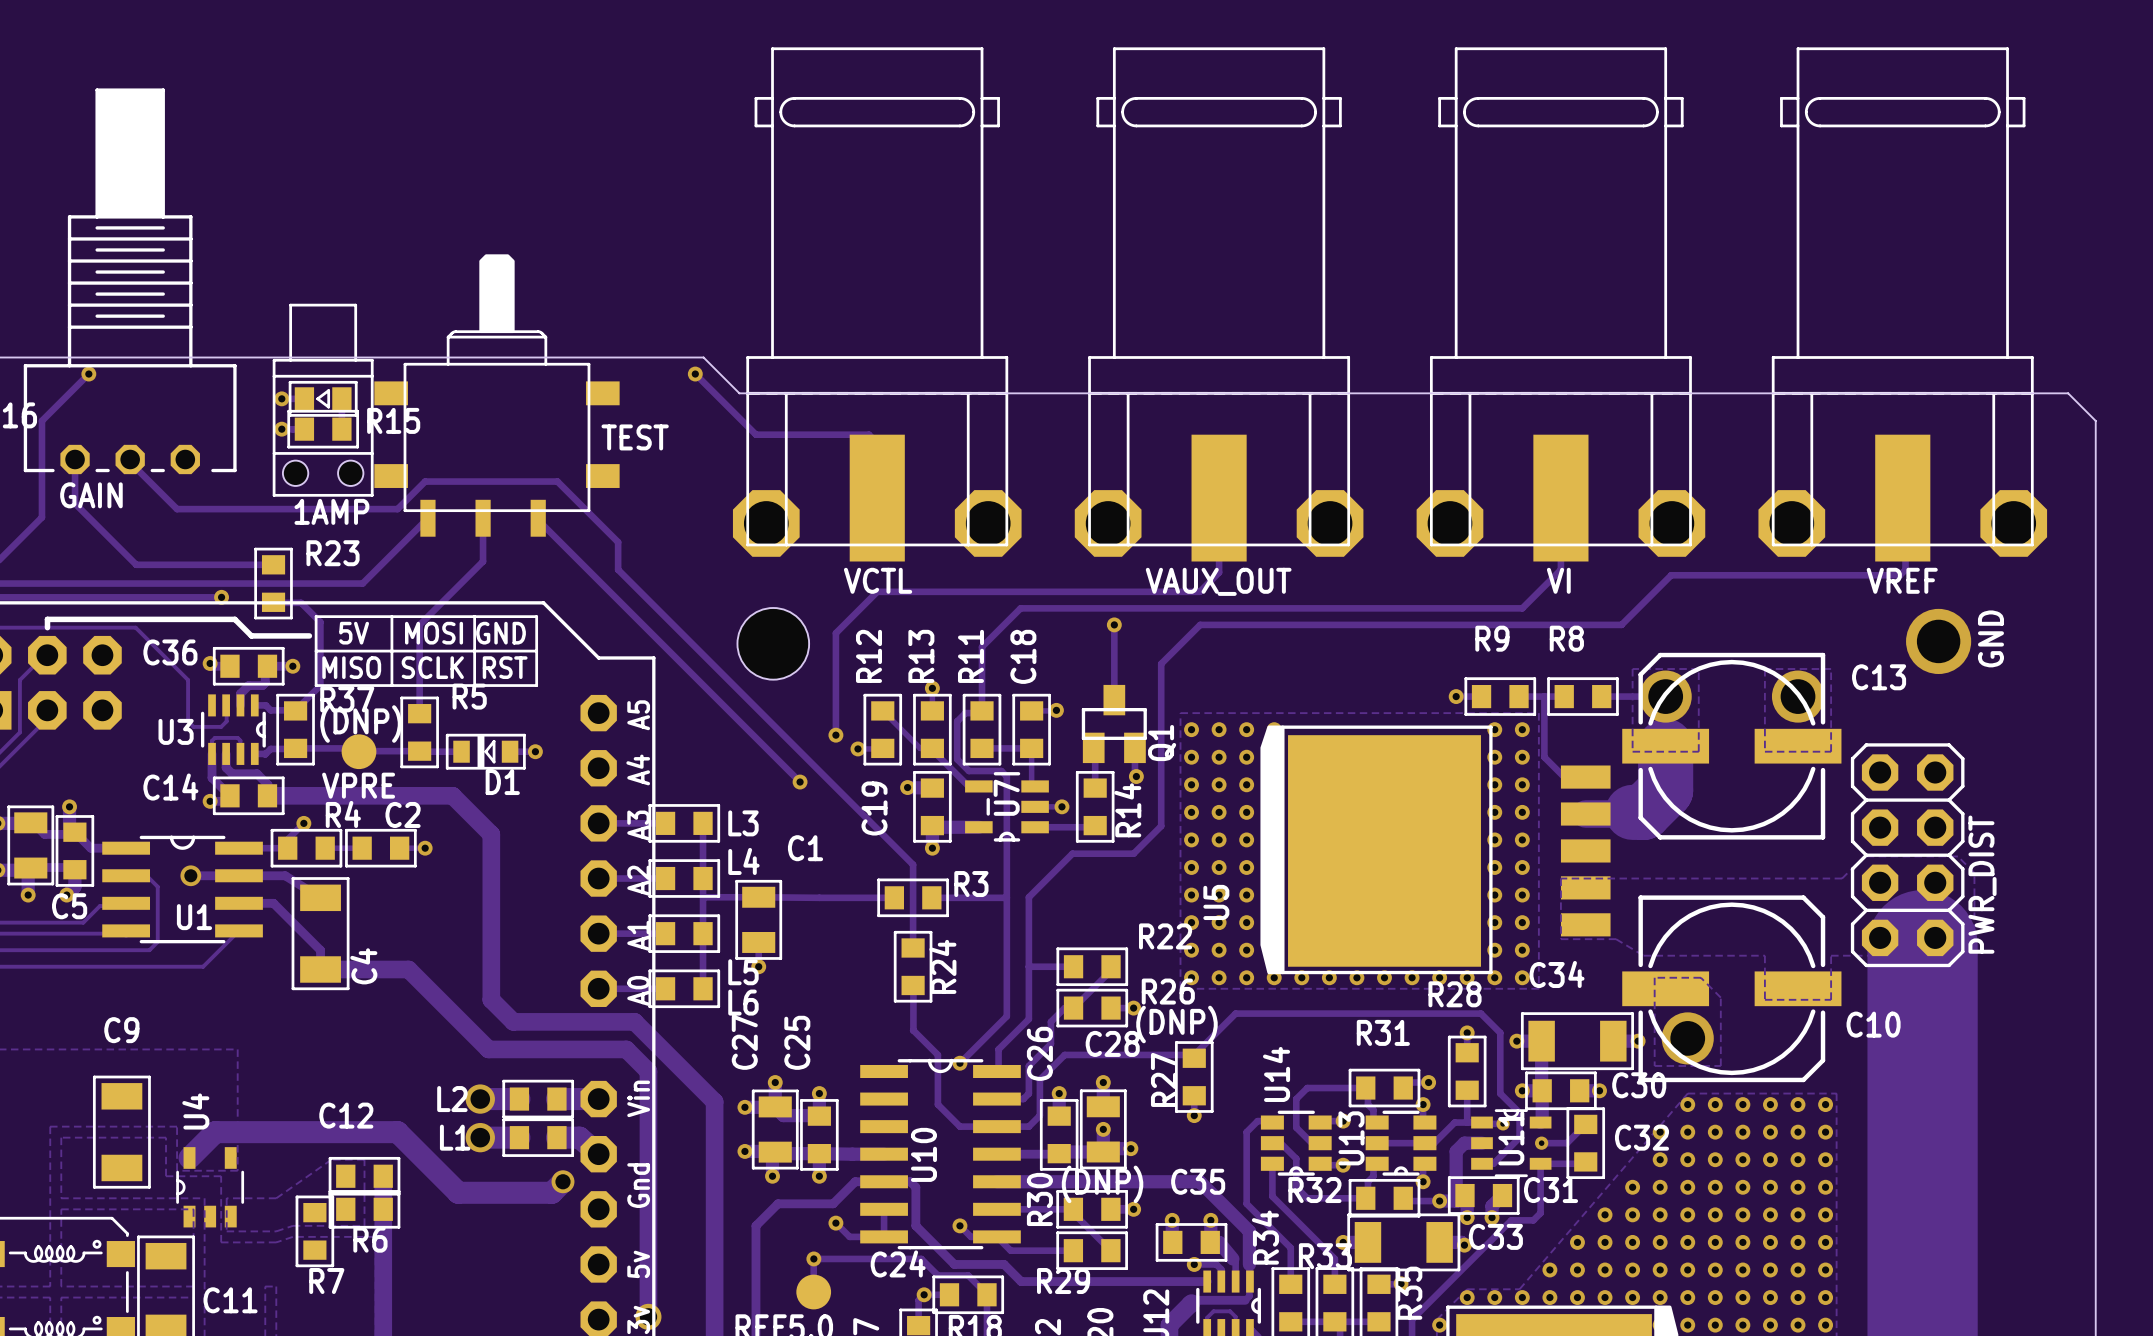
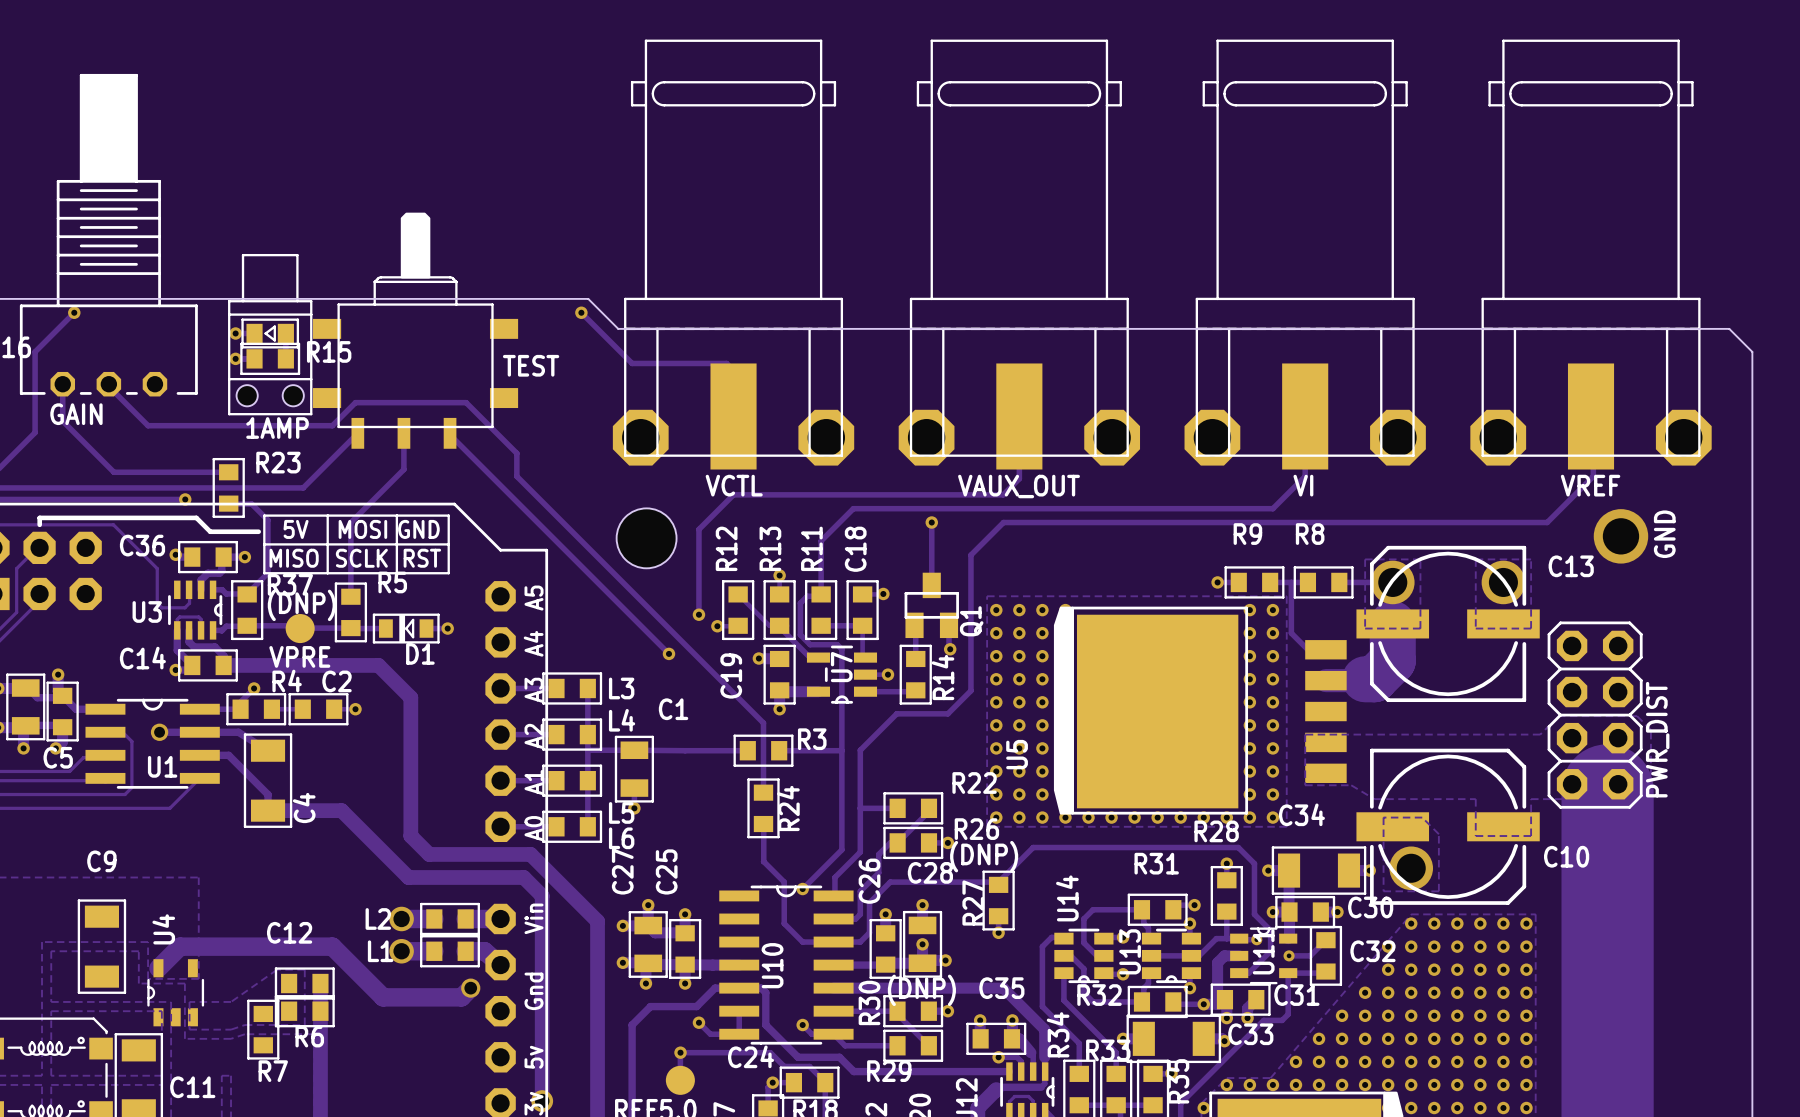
track: (1900, 575) (1671, 575) (1621, 624) -> (1588, 481) (1547, 522) (1355, 522)

